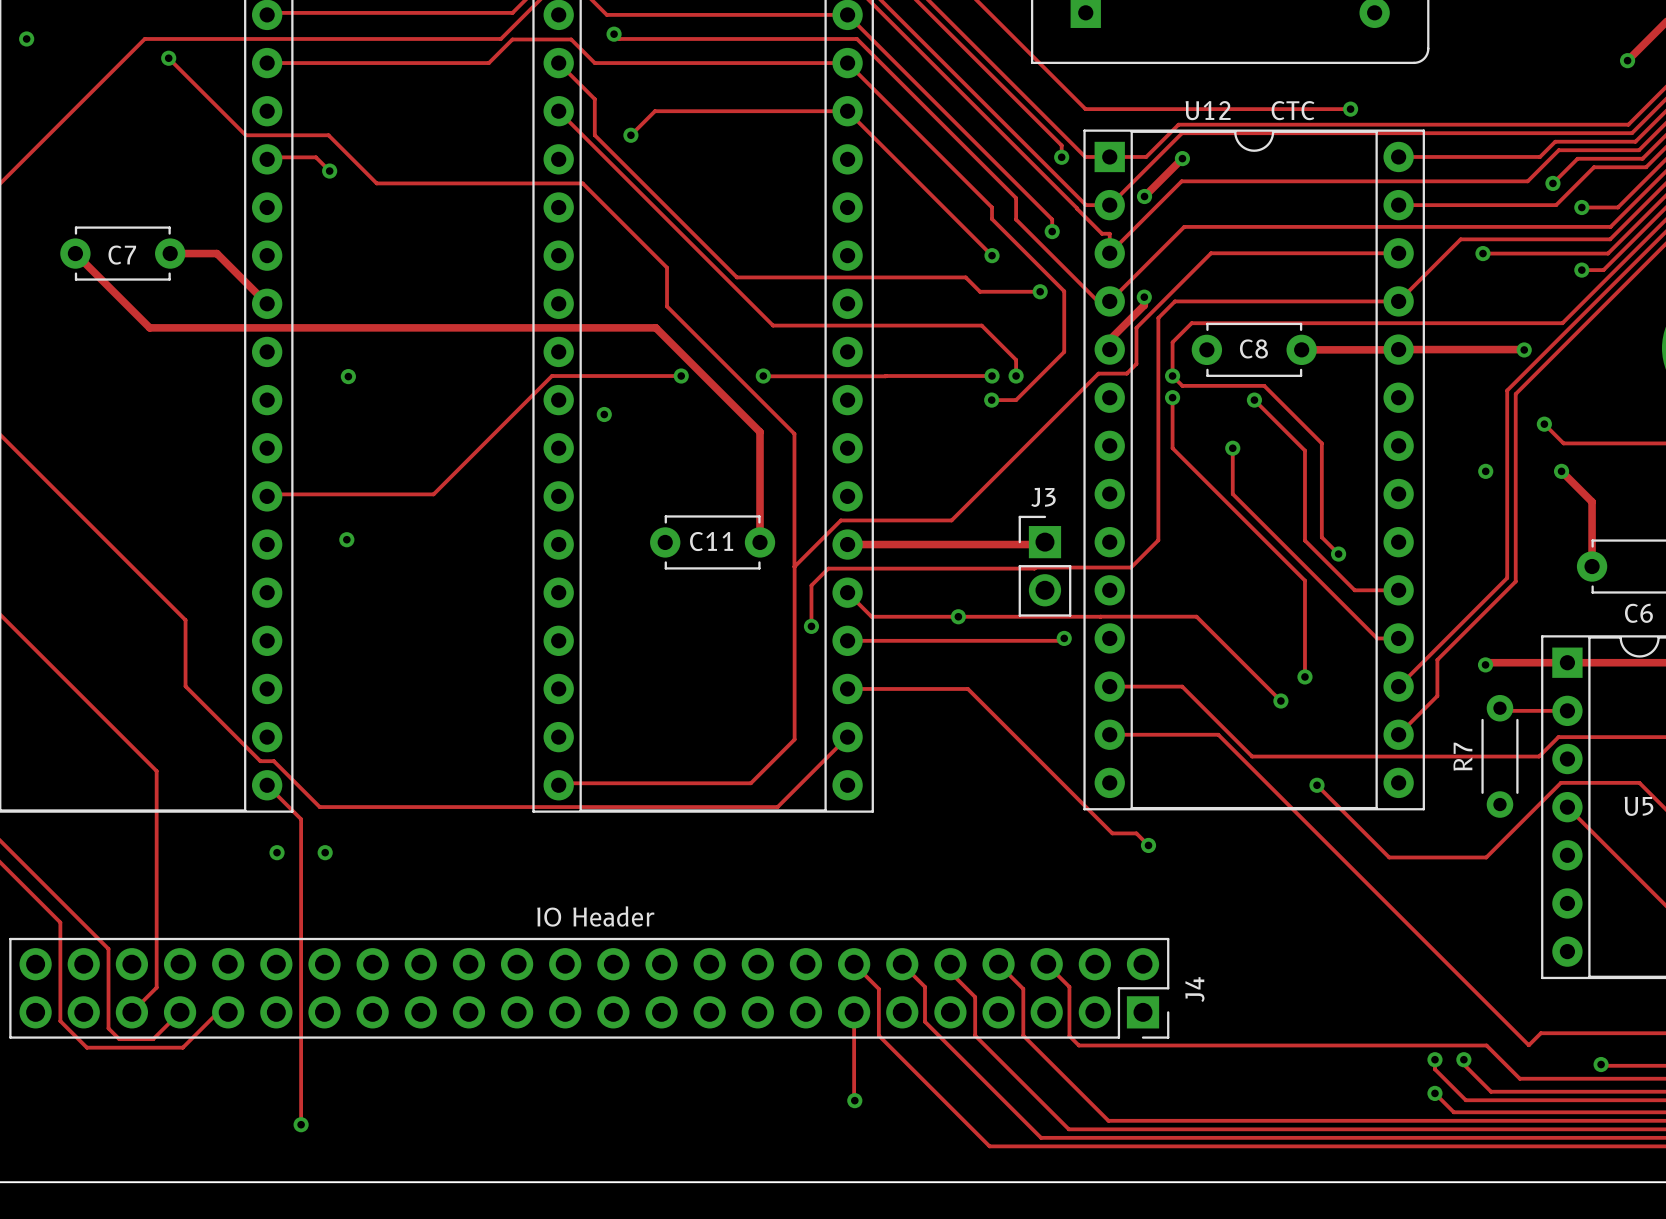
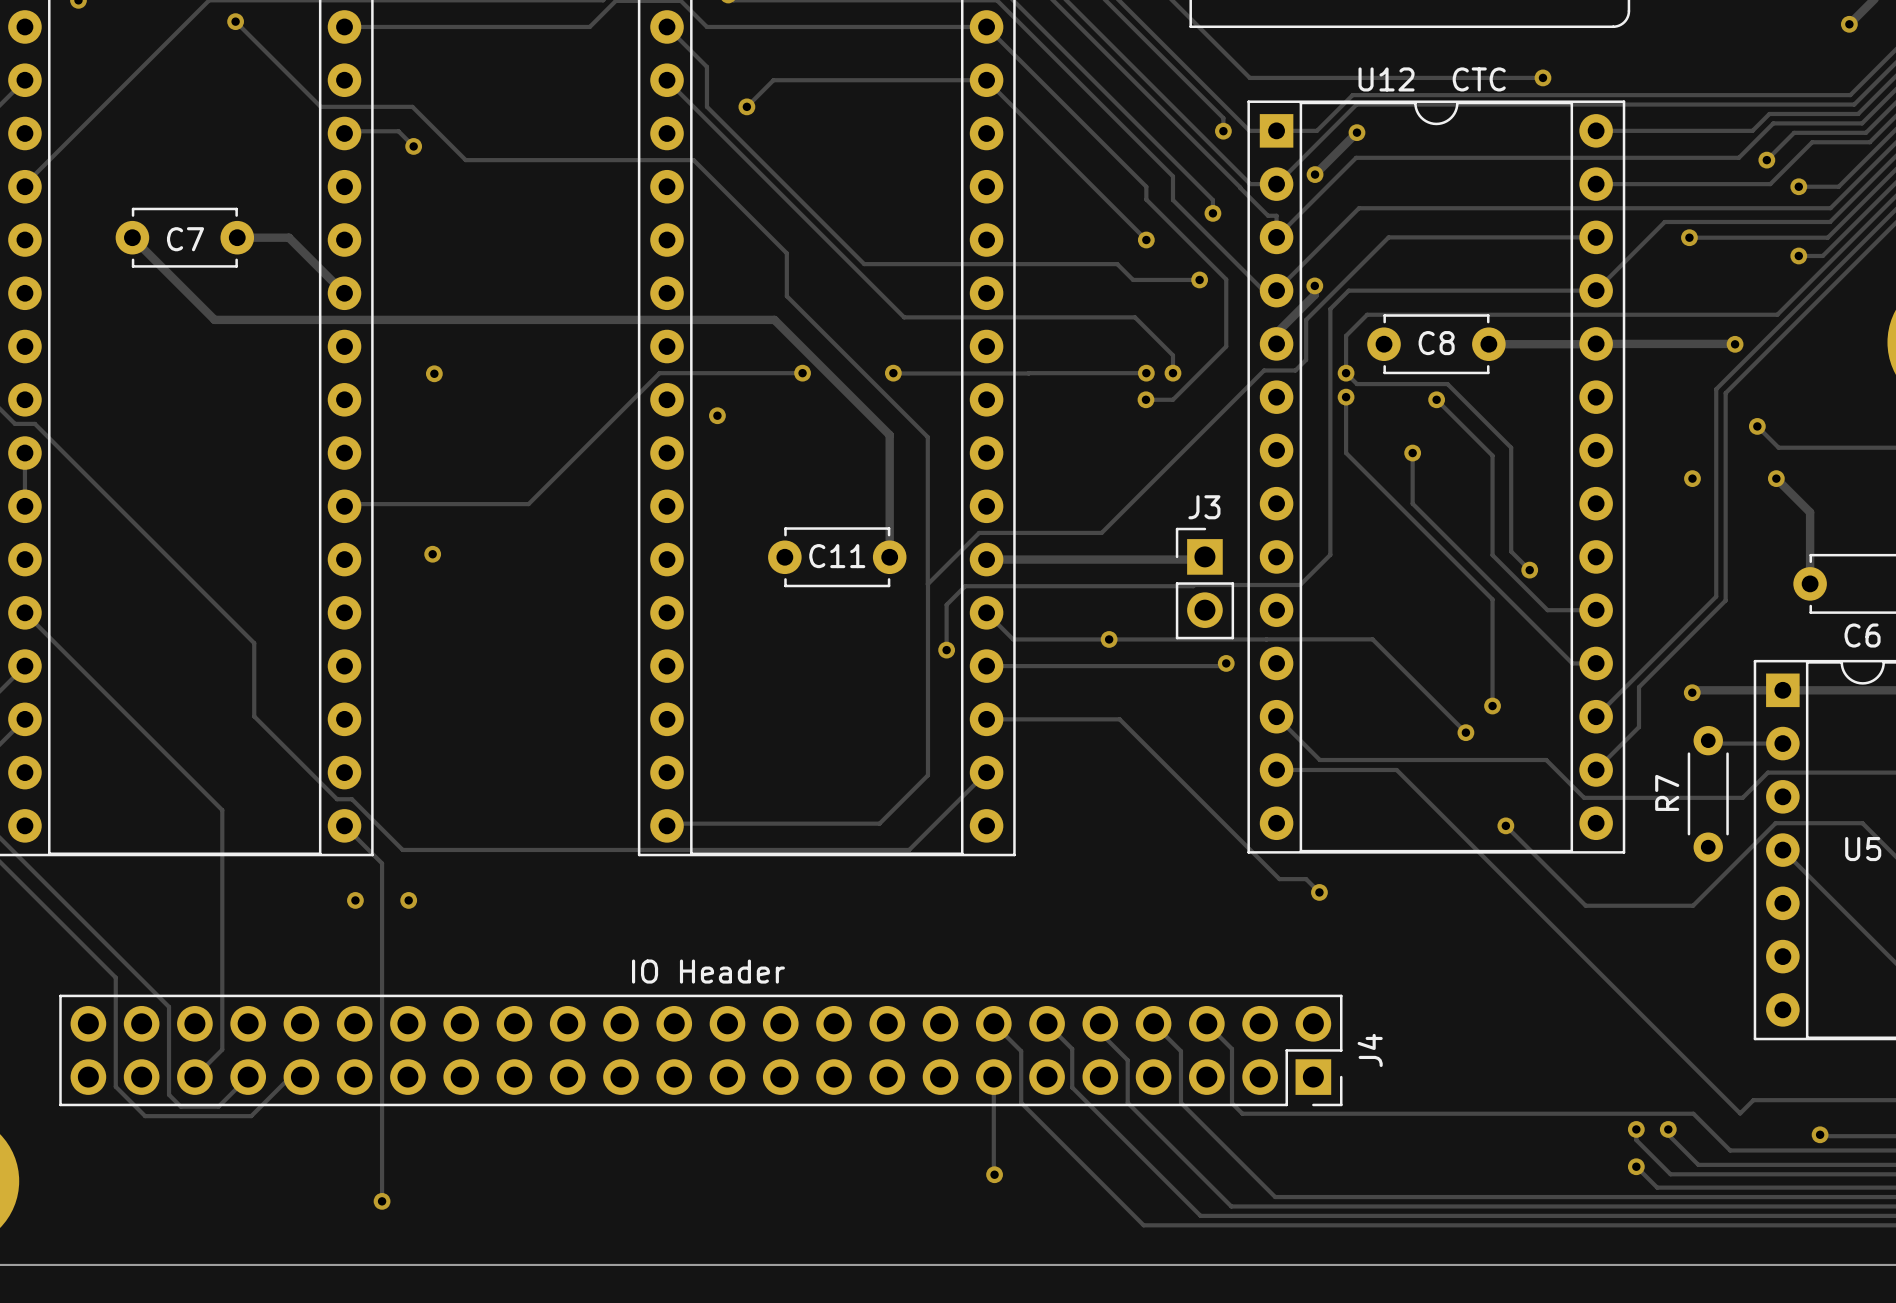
track: (1109, 686) (1182, 686) (1252, 756) (1539, 756) (1558, 737) -> (1276, 716) (1319, 760) (1546, 760) (1584, 797) (1742, 797) (1767, 772) (1772, 772)

